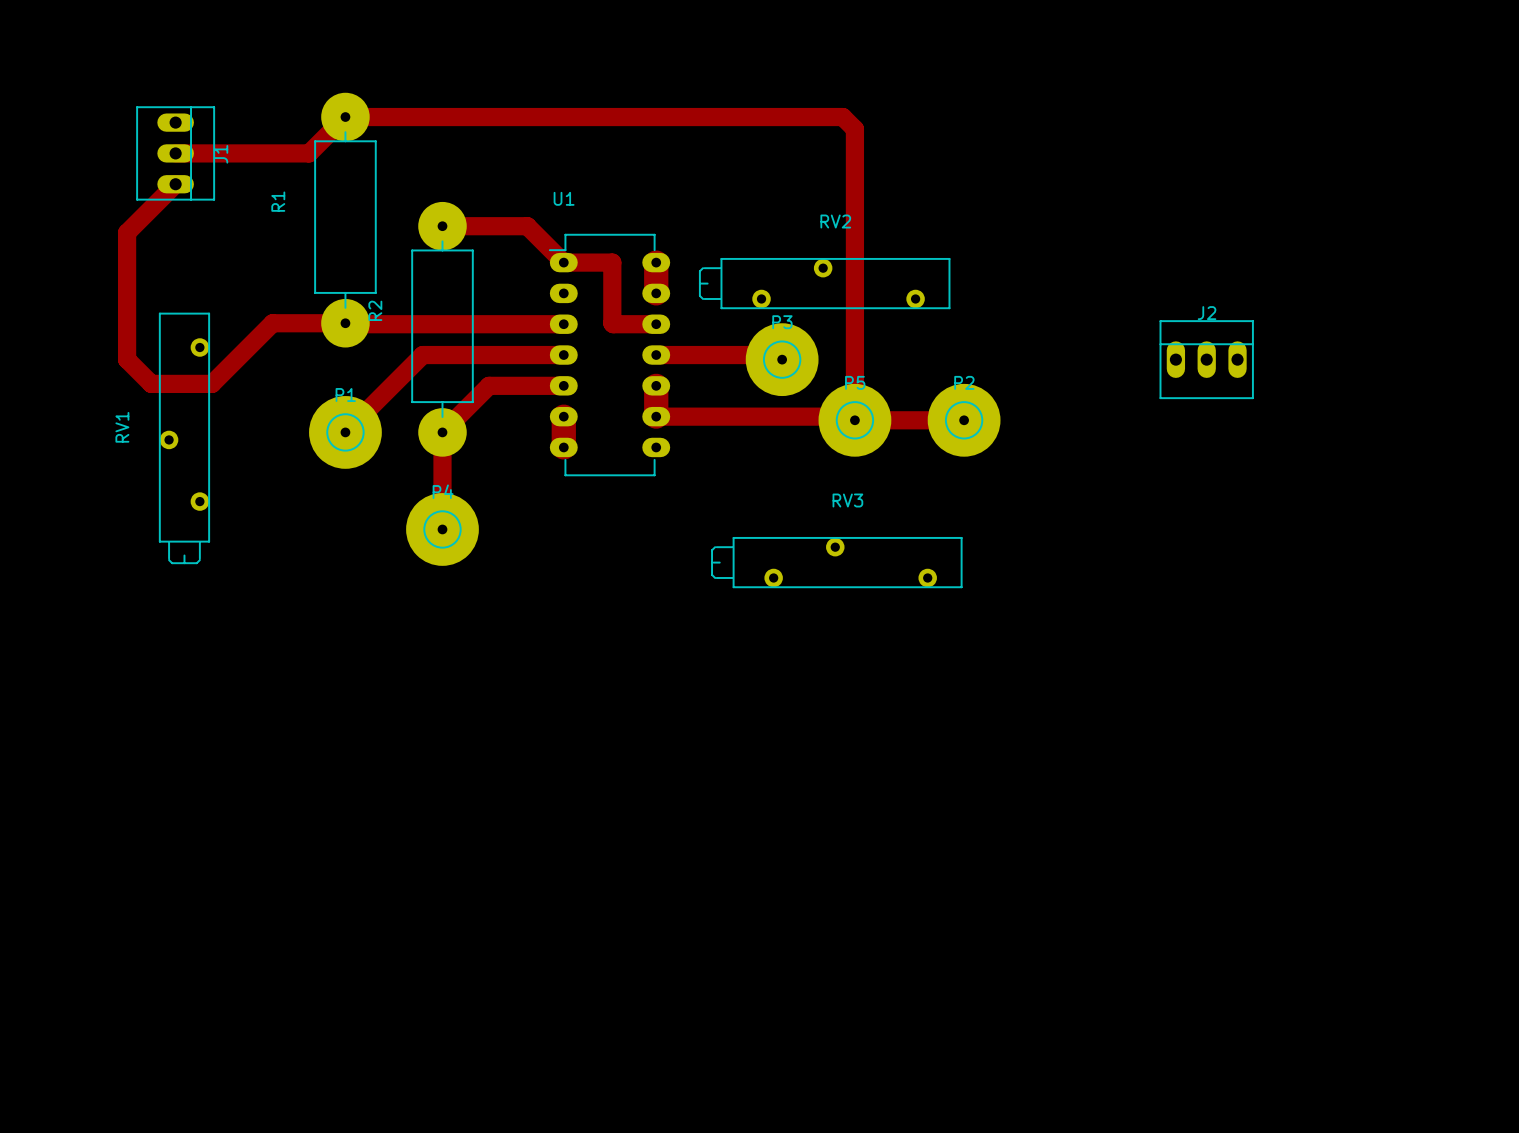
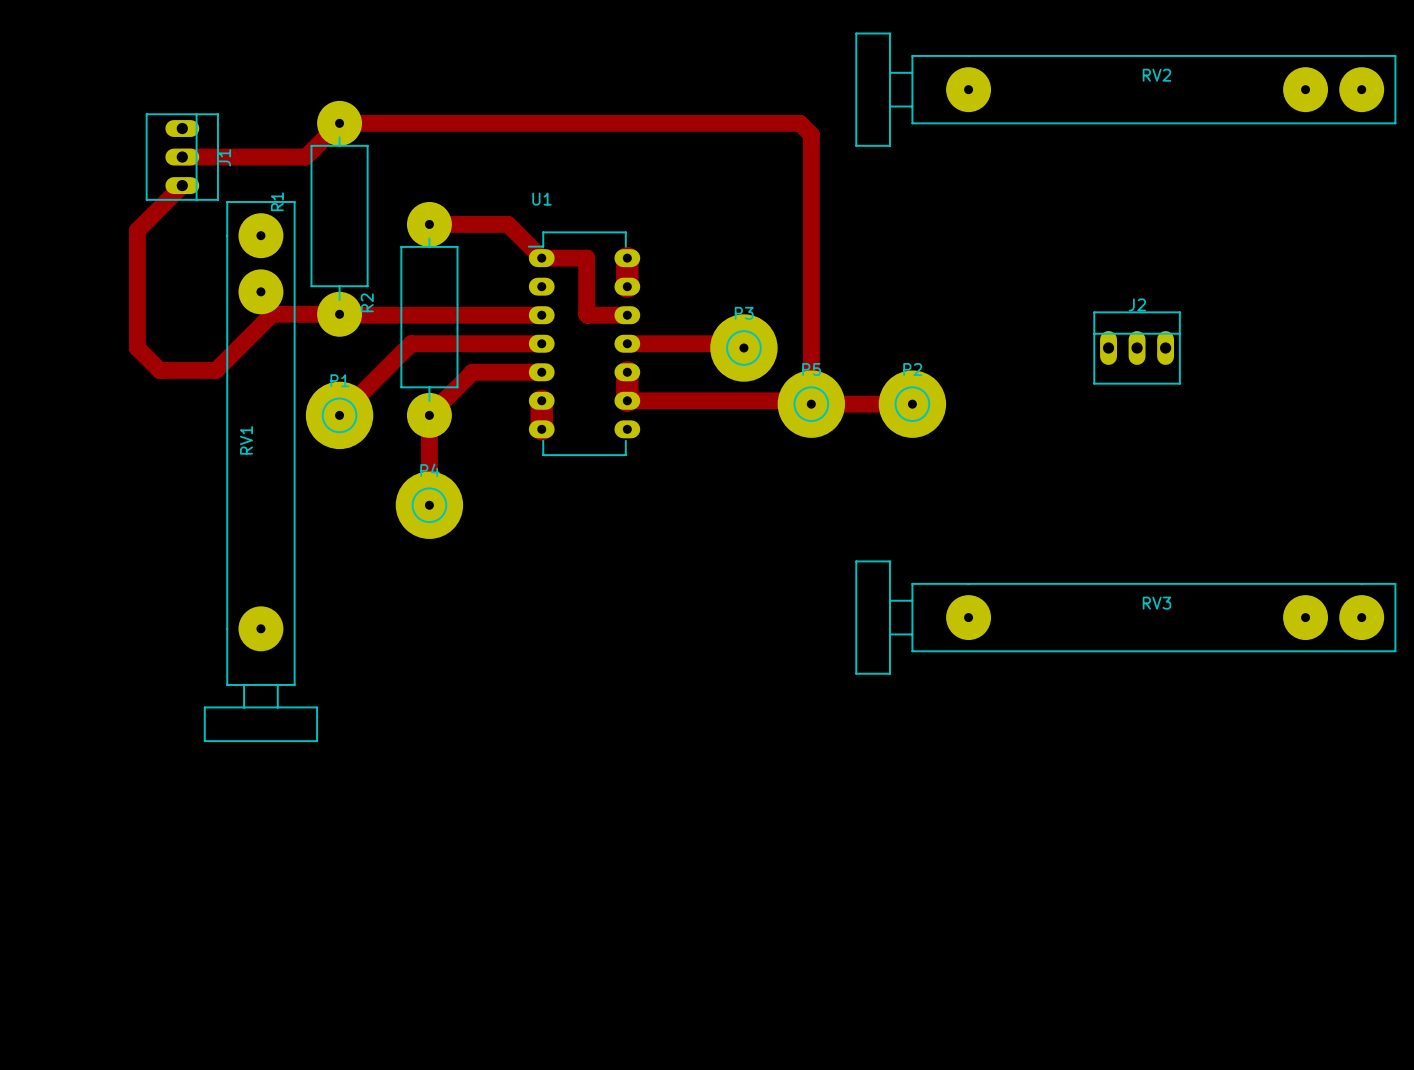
RV2 name position: RV2 (835, 221) -> RV2 (1156, 75)
RV2 footprint: [698, 258, 951, 310] -> [855, 32, 1397, 147]
RV1 footprint: [158, 312, 211, 565] -> [203, 201, 318, 742]
RV1 name position: RV1 (122, 427) -> RV1 (246, 440)
RV3 name position: RV3 (847, 500) -> RV3 (1156, 603)
RV3 footprint: [711, 537, 963, 589] -> [855, 560, 1397, 675]

